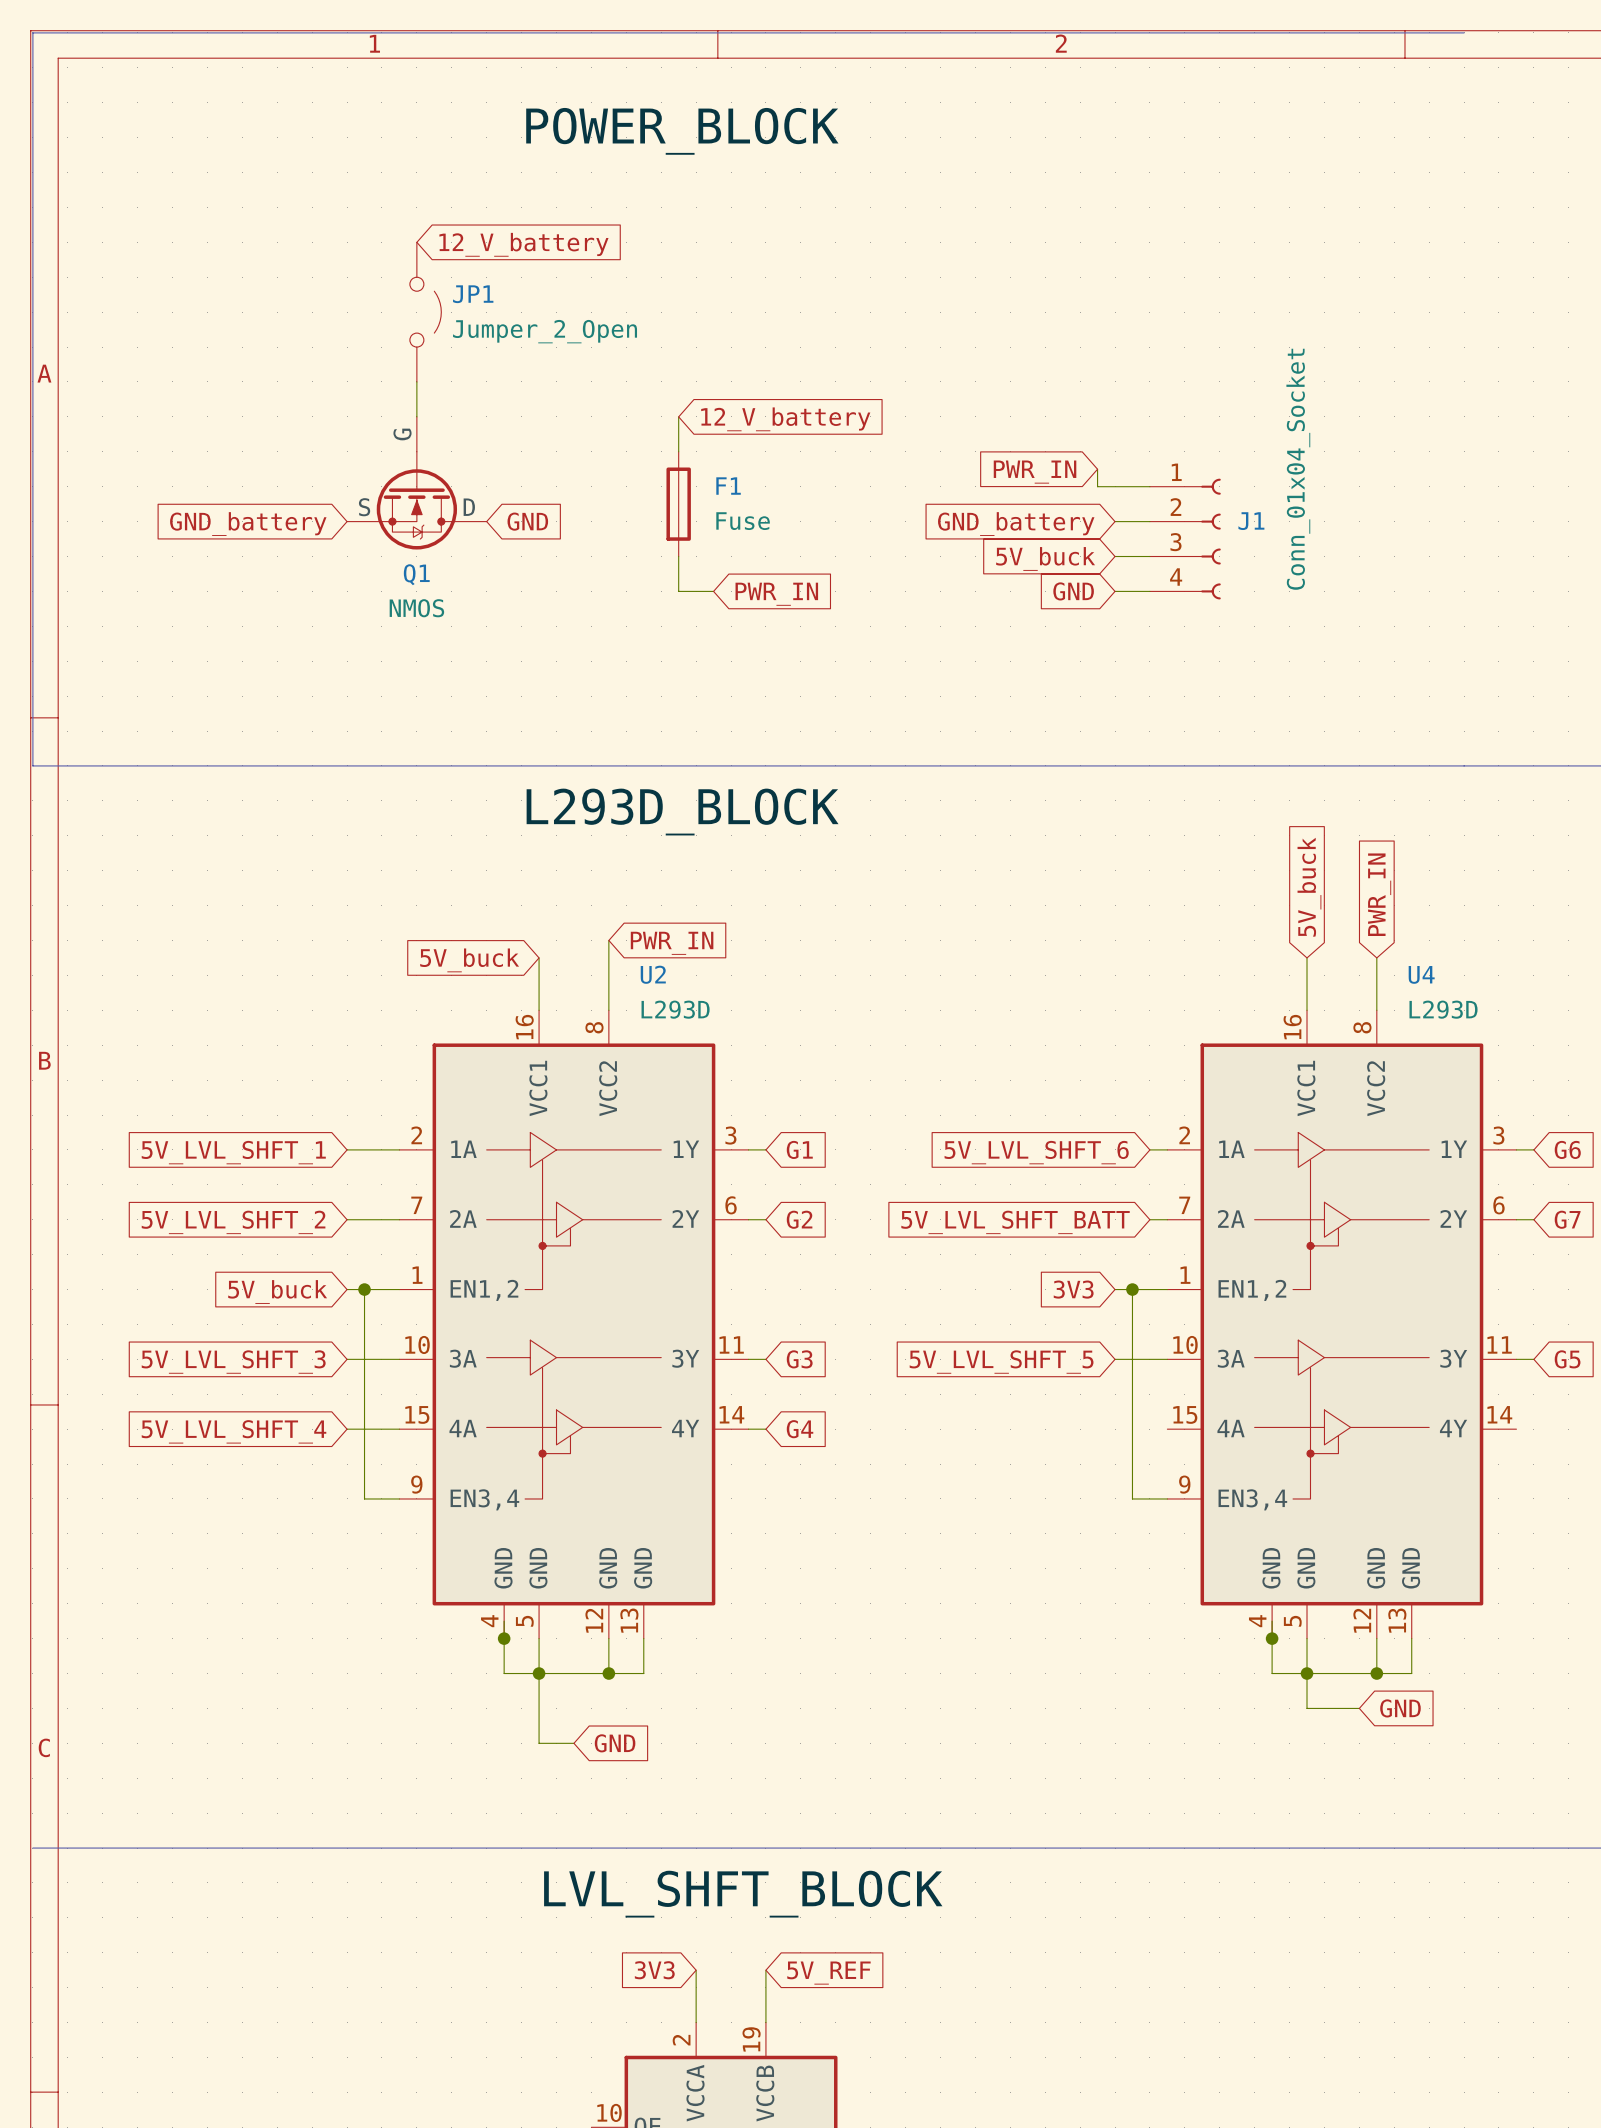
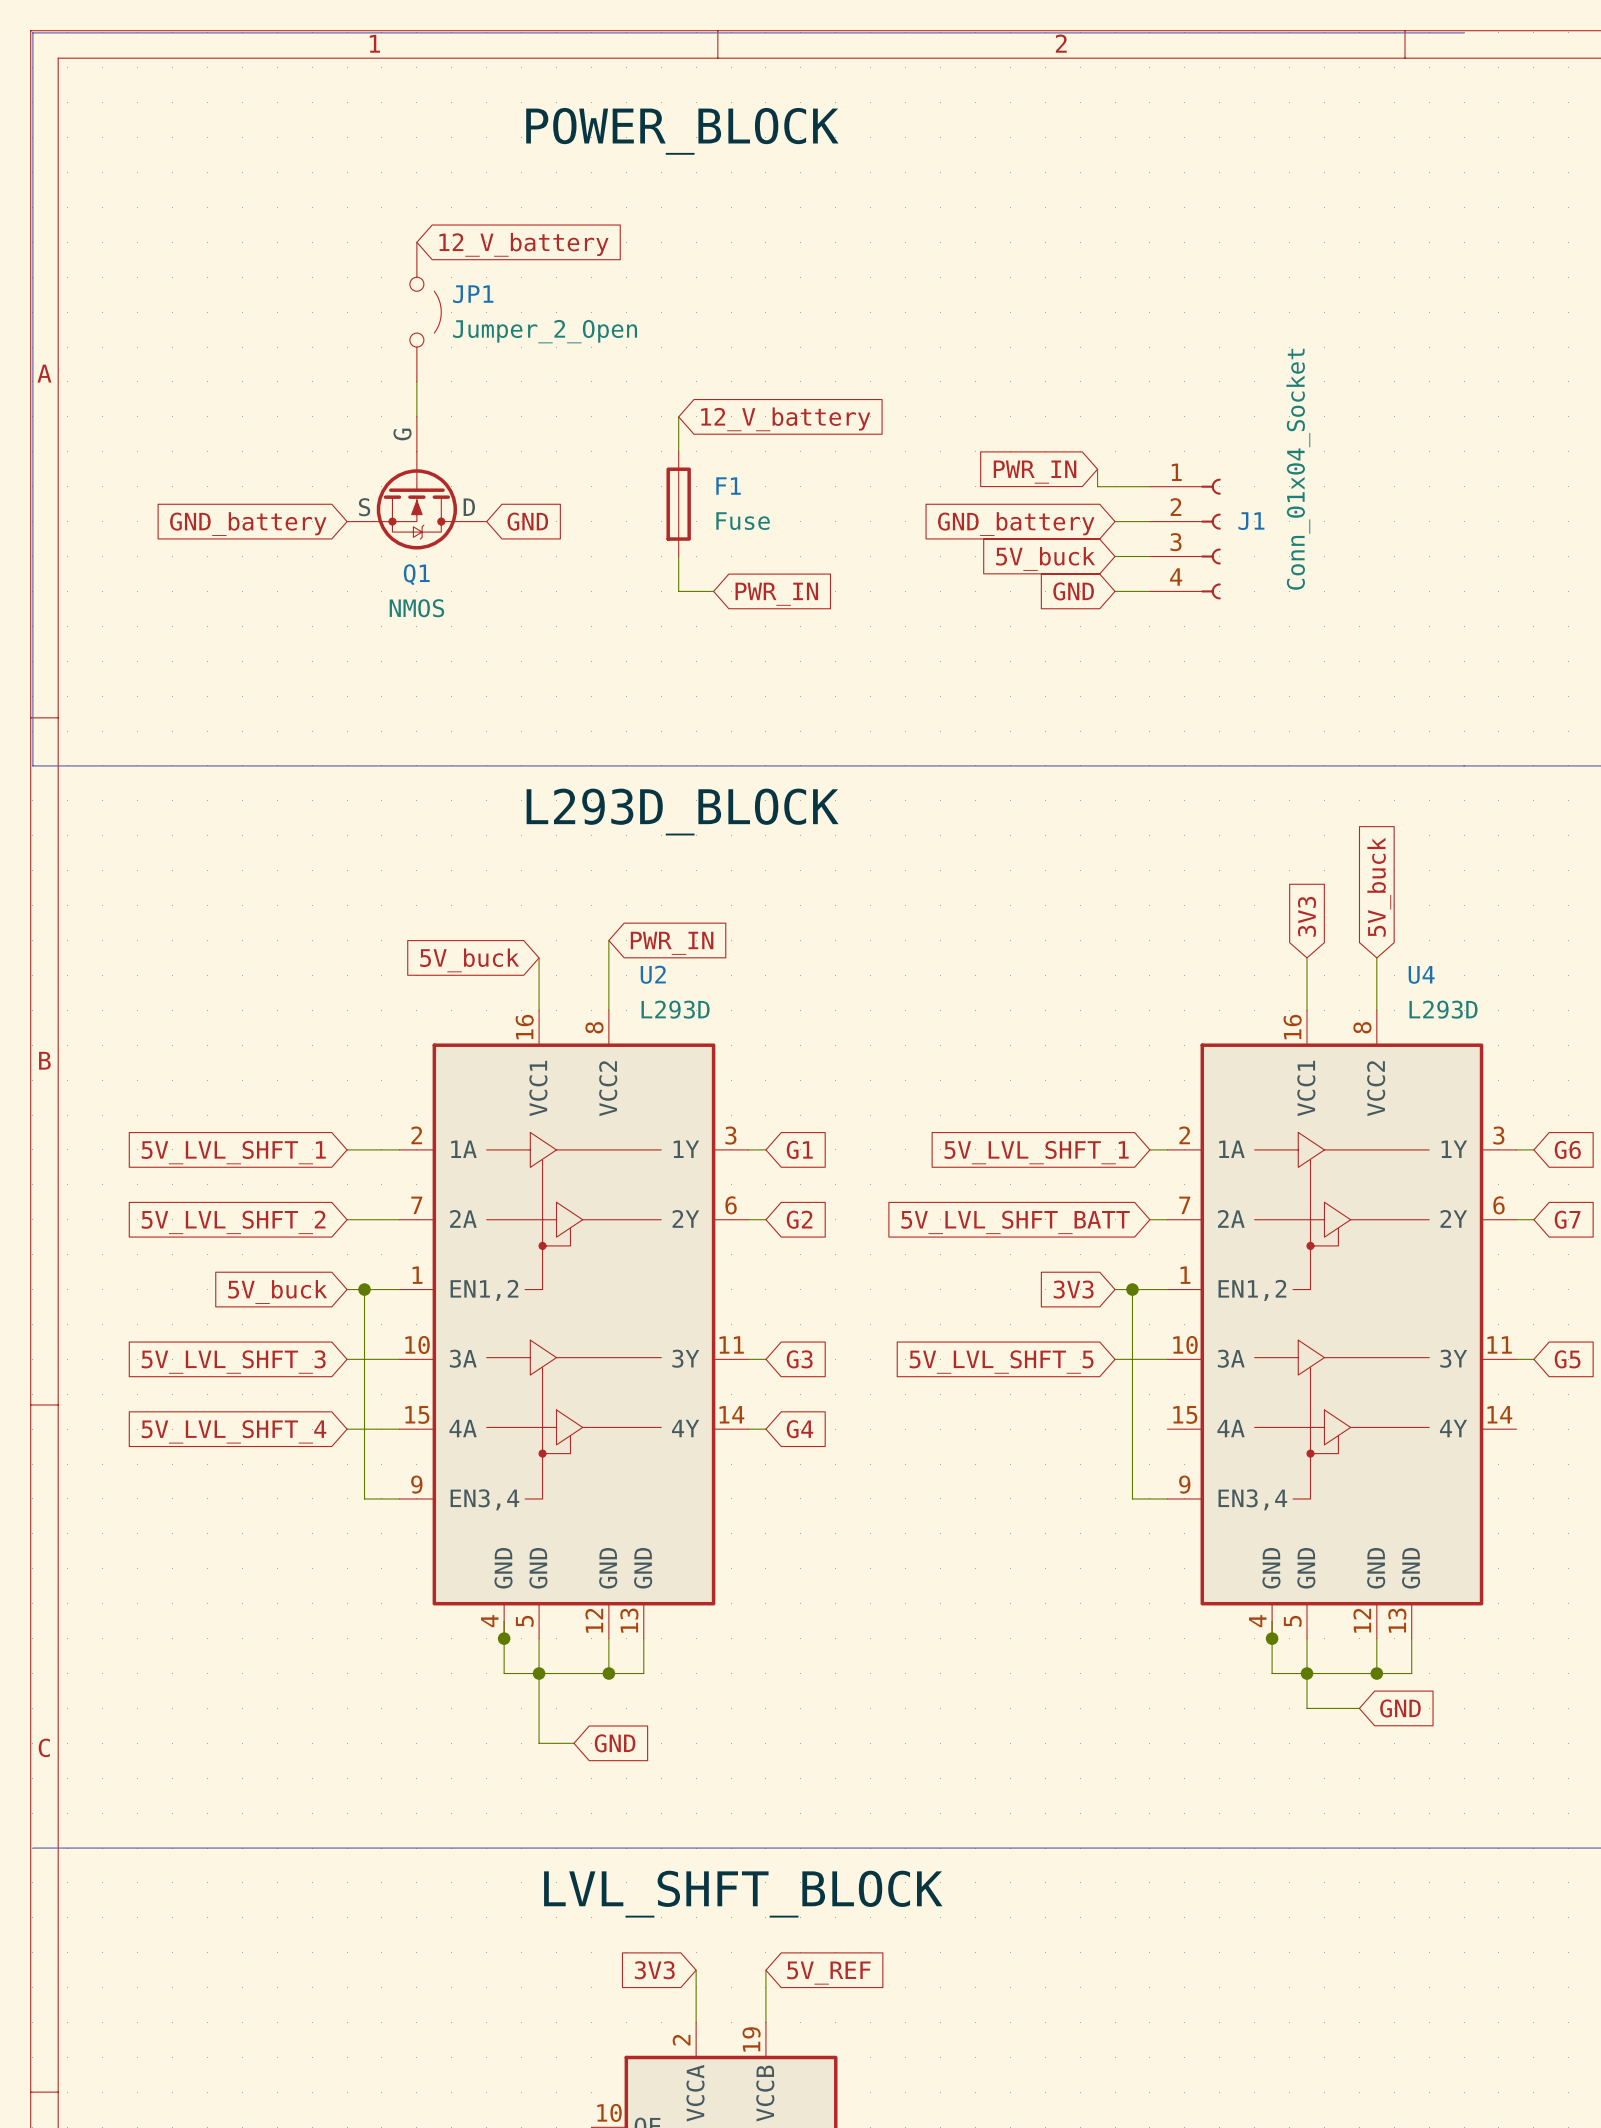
global label: 5V_buck (1309, 887) -> 3V3 (1307, 916)
global label: PWR_IN (1379, 894) -> 5V_buck (1379, 887)
global label: 5V_LVL_SHFT_6 (1036, 1152) -> 5V_LVL_SHFT_1 (1036, 1152)

